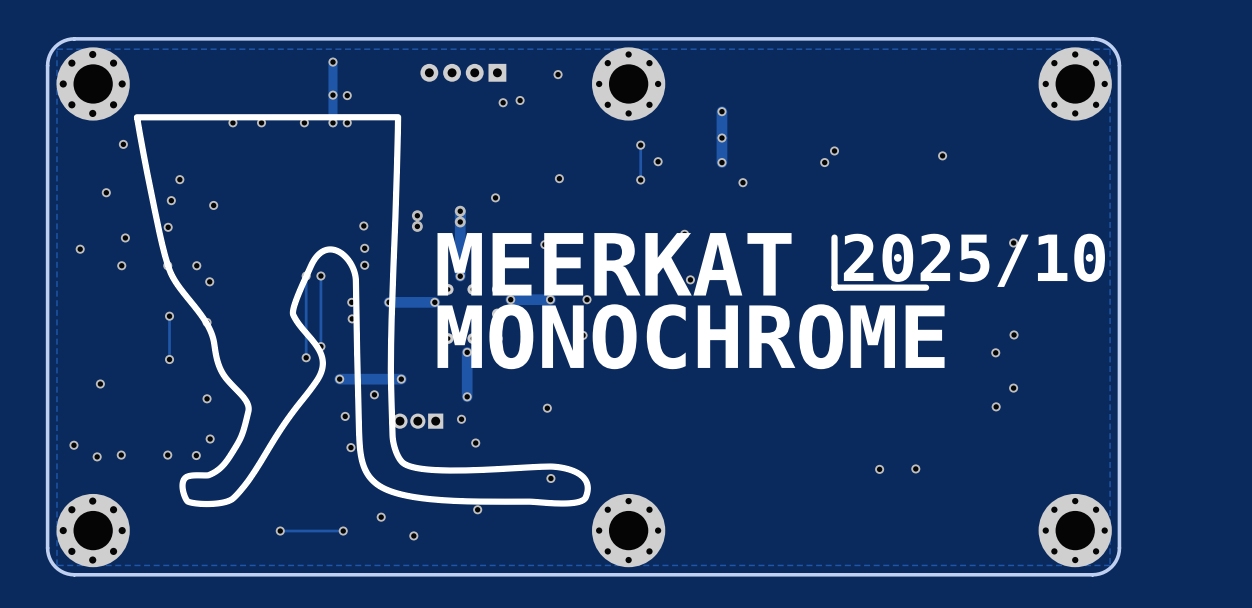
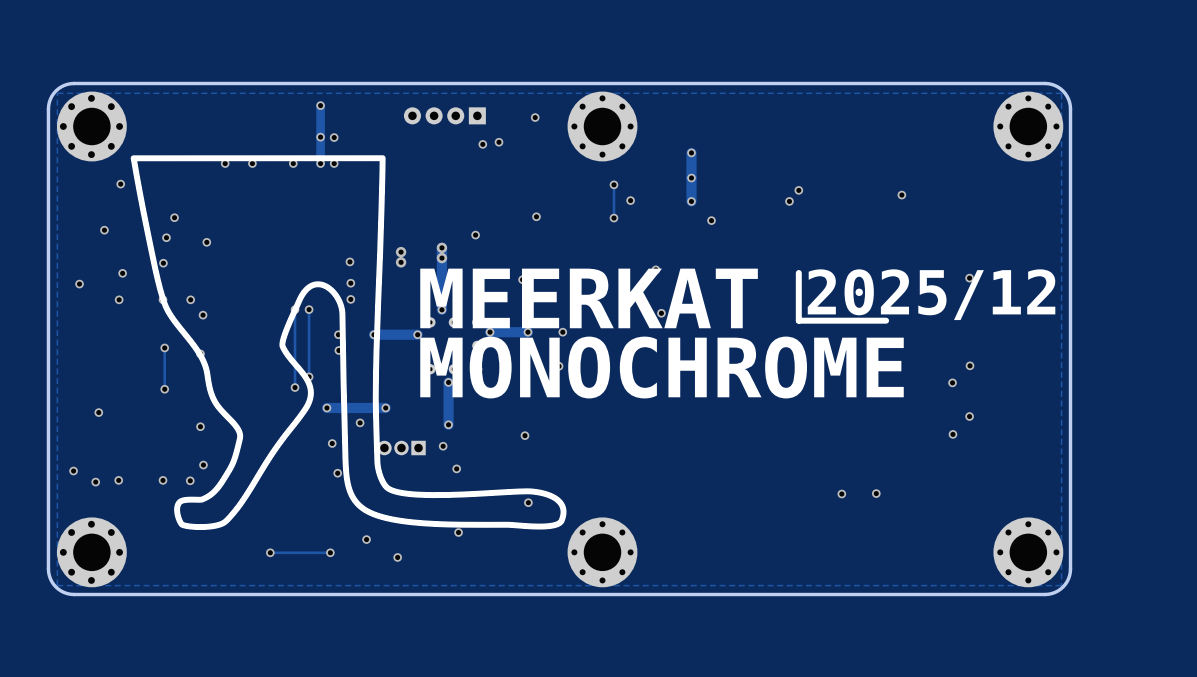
text: 2025/10 (974, 260) -> 2025/12 (931, 294)

